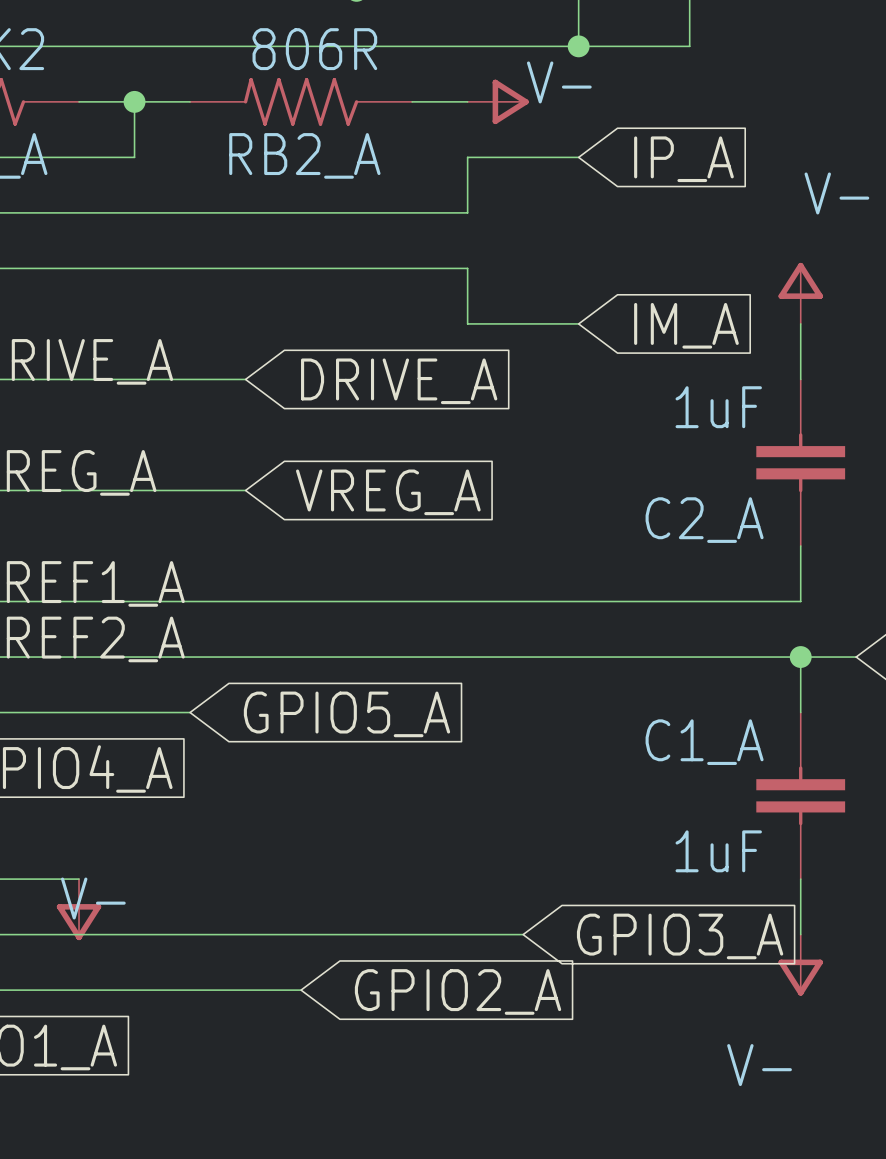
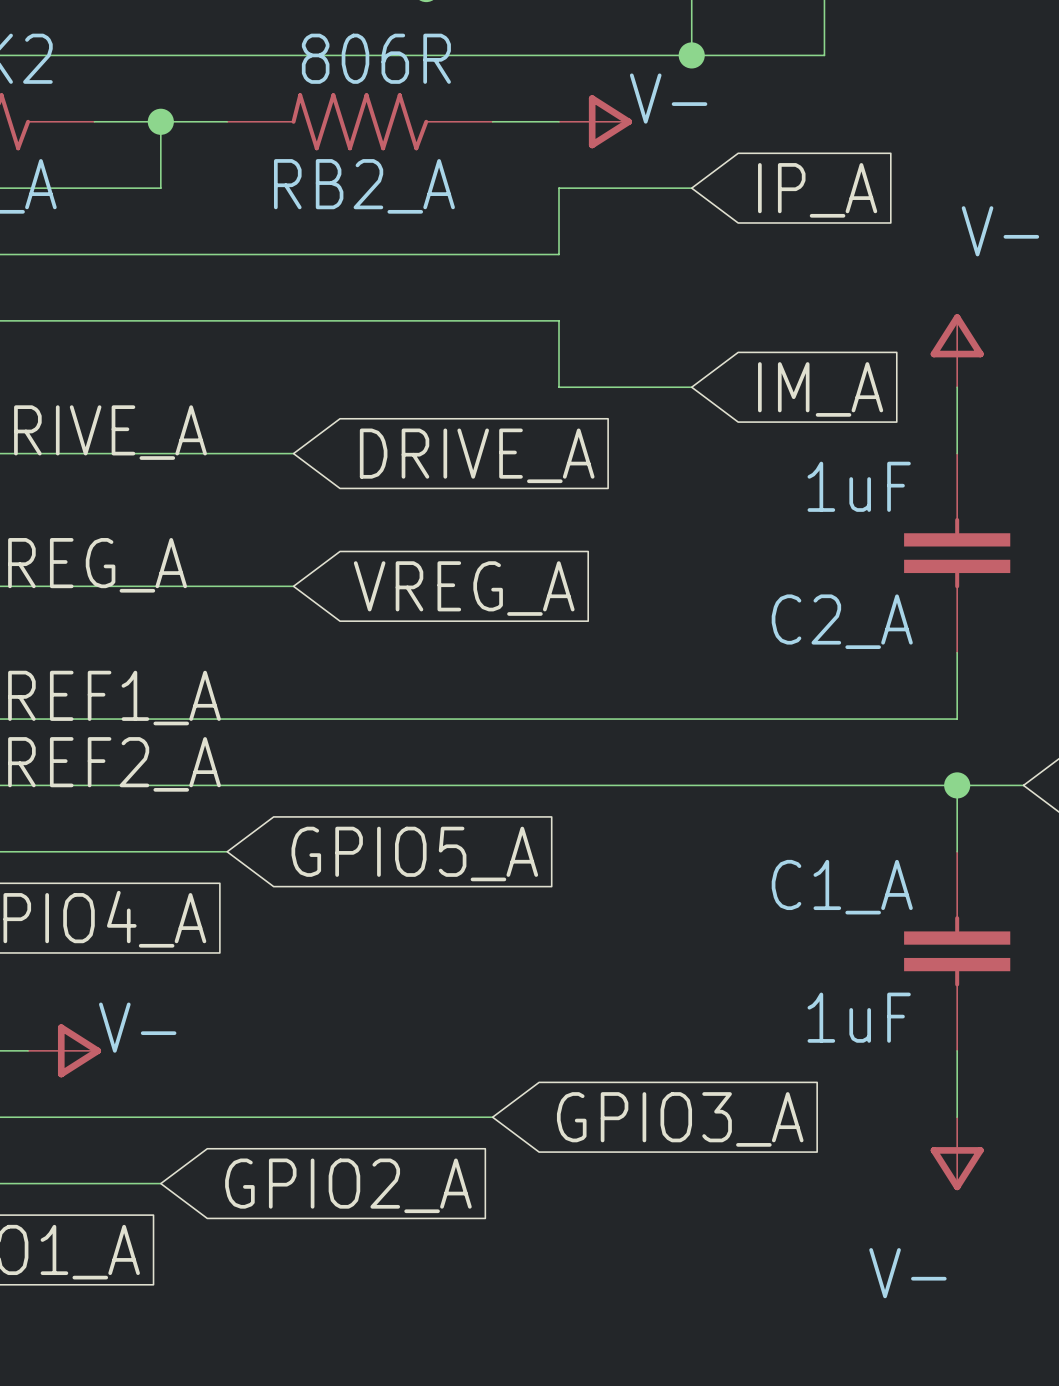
power symbol text position: V- (93, 898) -> V- (137, 1027)
power symbol position: V- (79, 909) -> V- (64, 1050)
power symbol rotation: 0° (79, 922) -> 90° counterclockwise (79, 1050)
wire: (412, 934) (523, 934) -> none
global label position: GPIO3_A (680, 936) -> GPIO3_A (680, 1119)
wire: (134, 990) (301, 990) -> none
global label position: GPIO2_A (458, 991) -> GPIO2_A (348, 1185)

